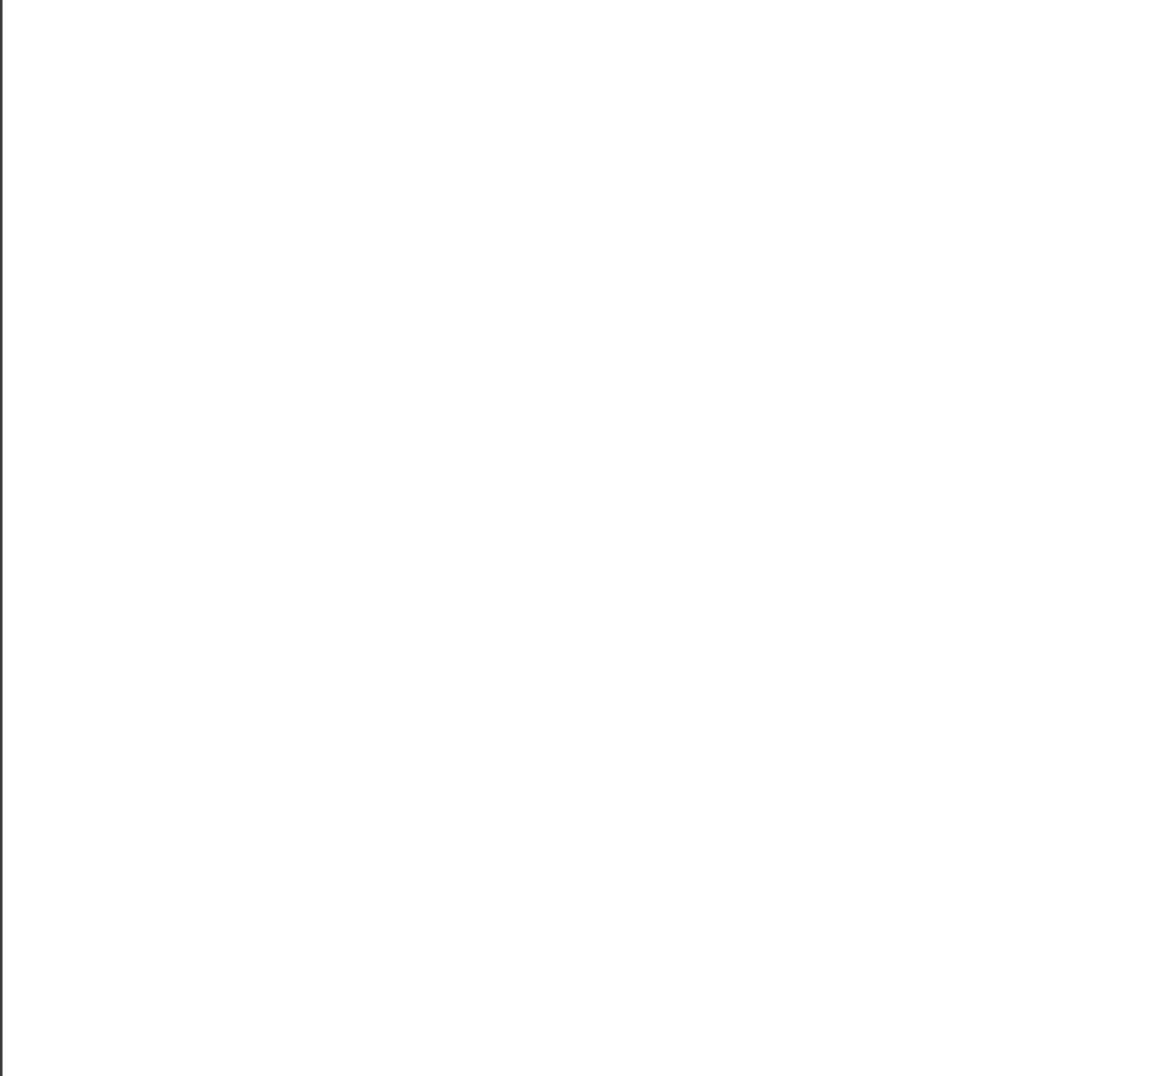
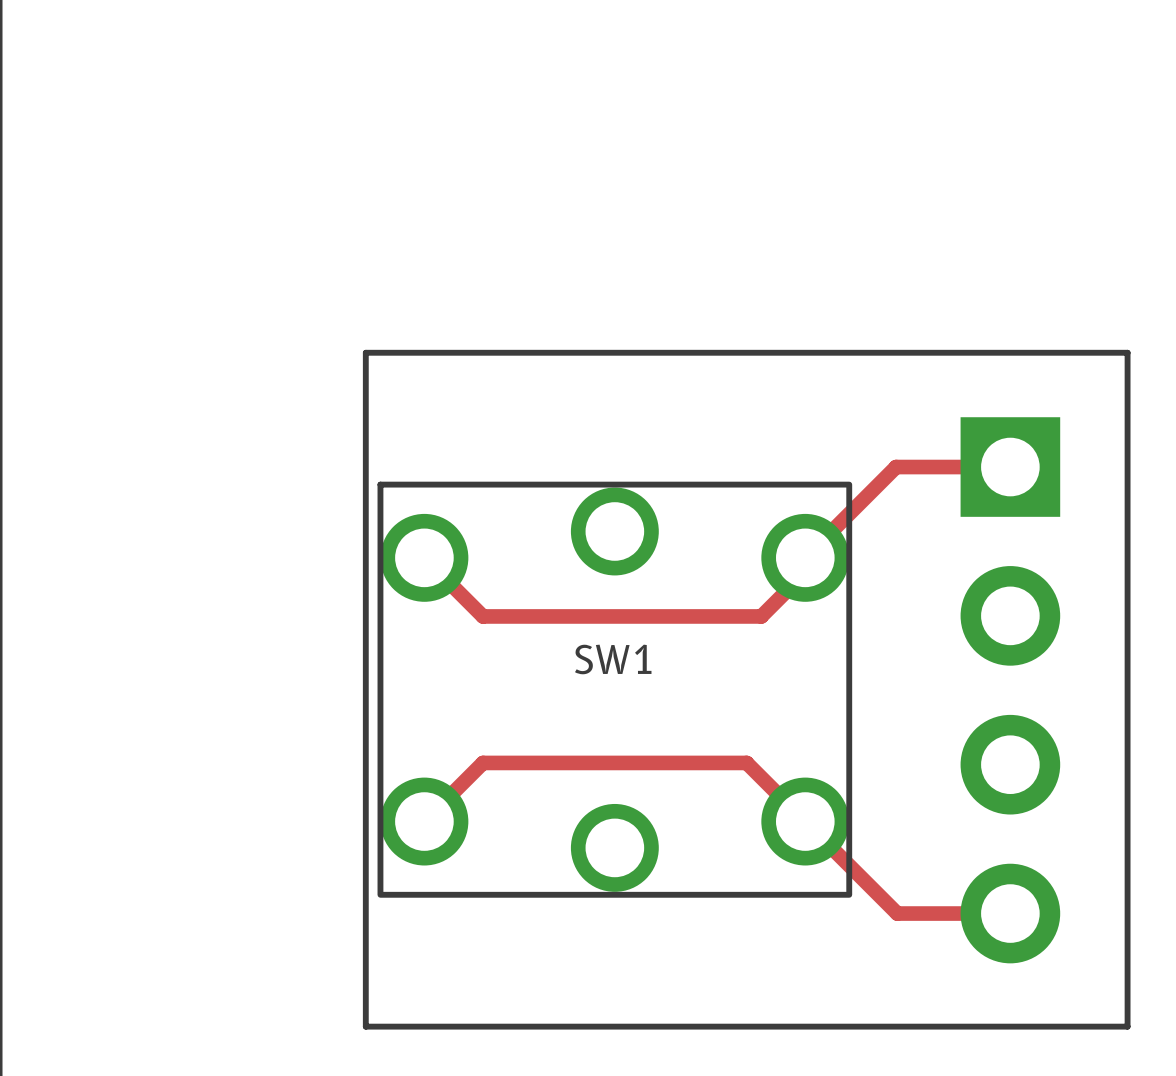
line: none -> (365, 352) (1127, 352) (1127, 1026) (365, 1026) (365, 352)
track: none -> (1010, 467) (896, 467) (805, 557) (805, 572) (761, 616) (483, 616) (424, 557)
SW1: none -> (614, 689)
part: none -> (1010, 690)
track: none -> (424, 821) (483, 762) (746, 762) (897, 913) (1010, 913)

